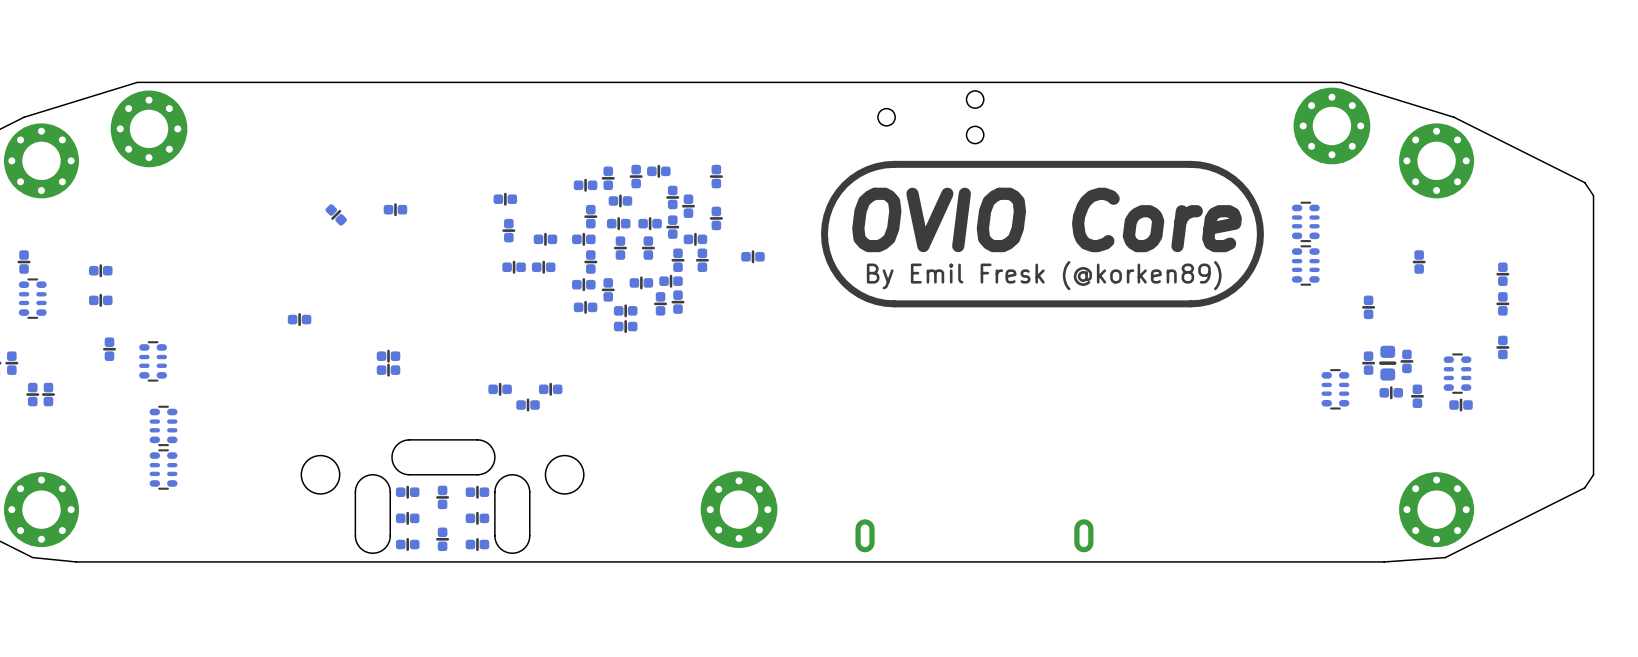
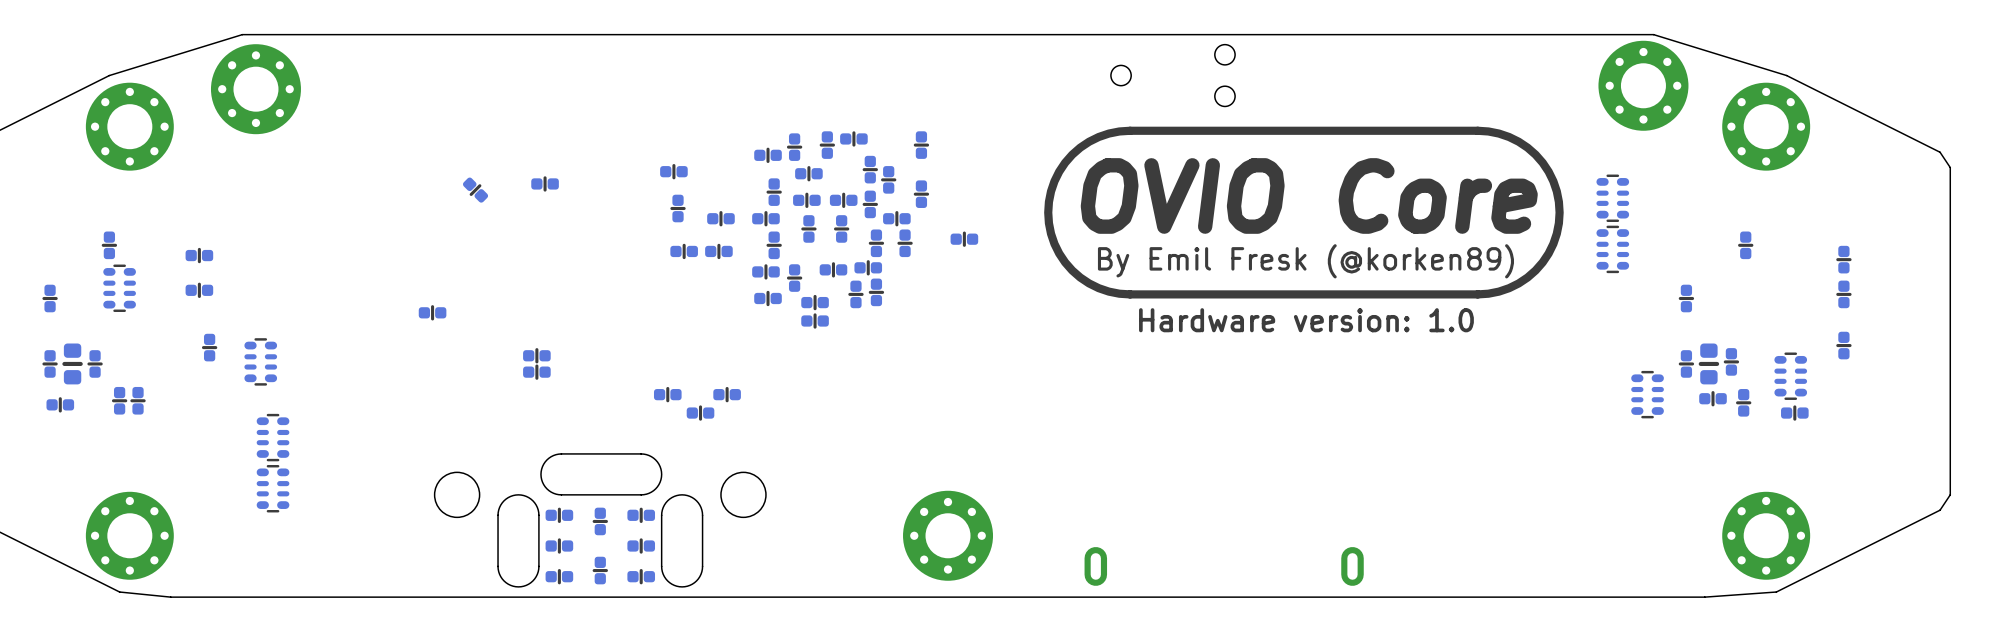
text: none -> Hardware version: 1.0 (1306, 320)

